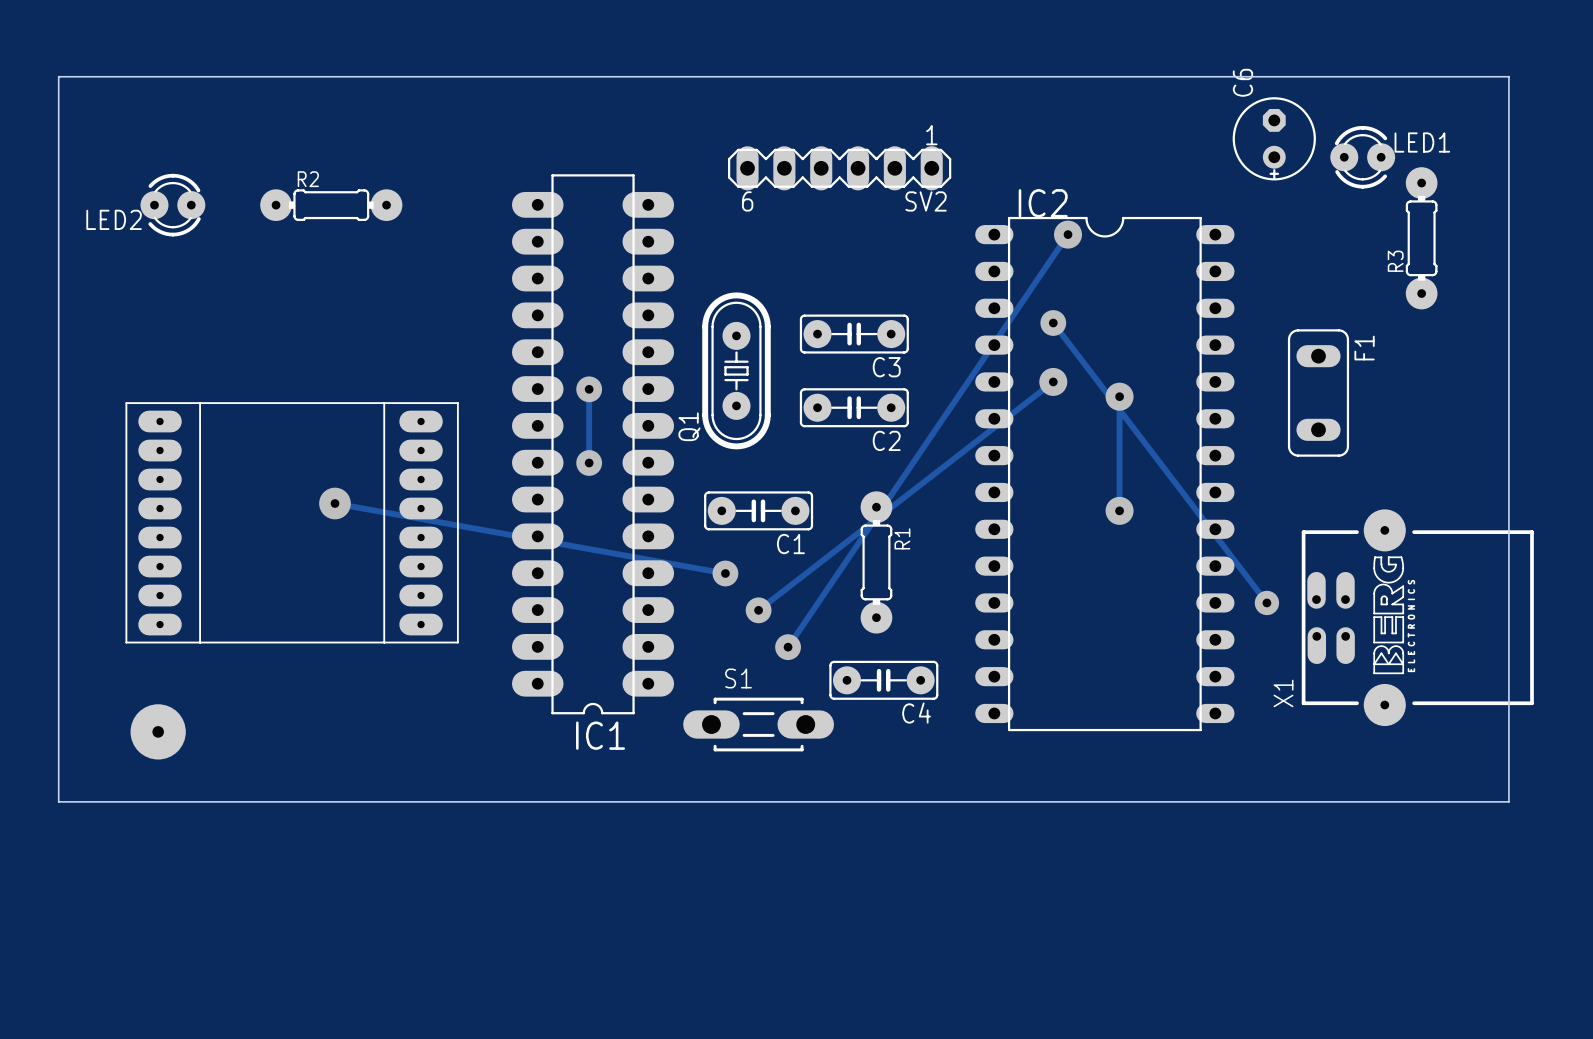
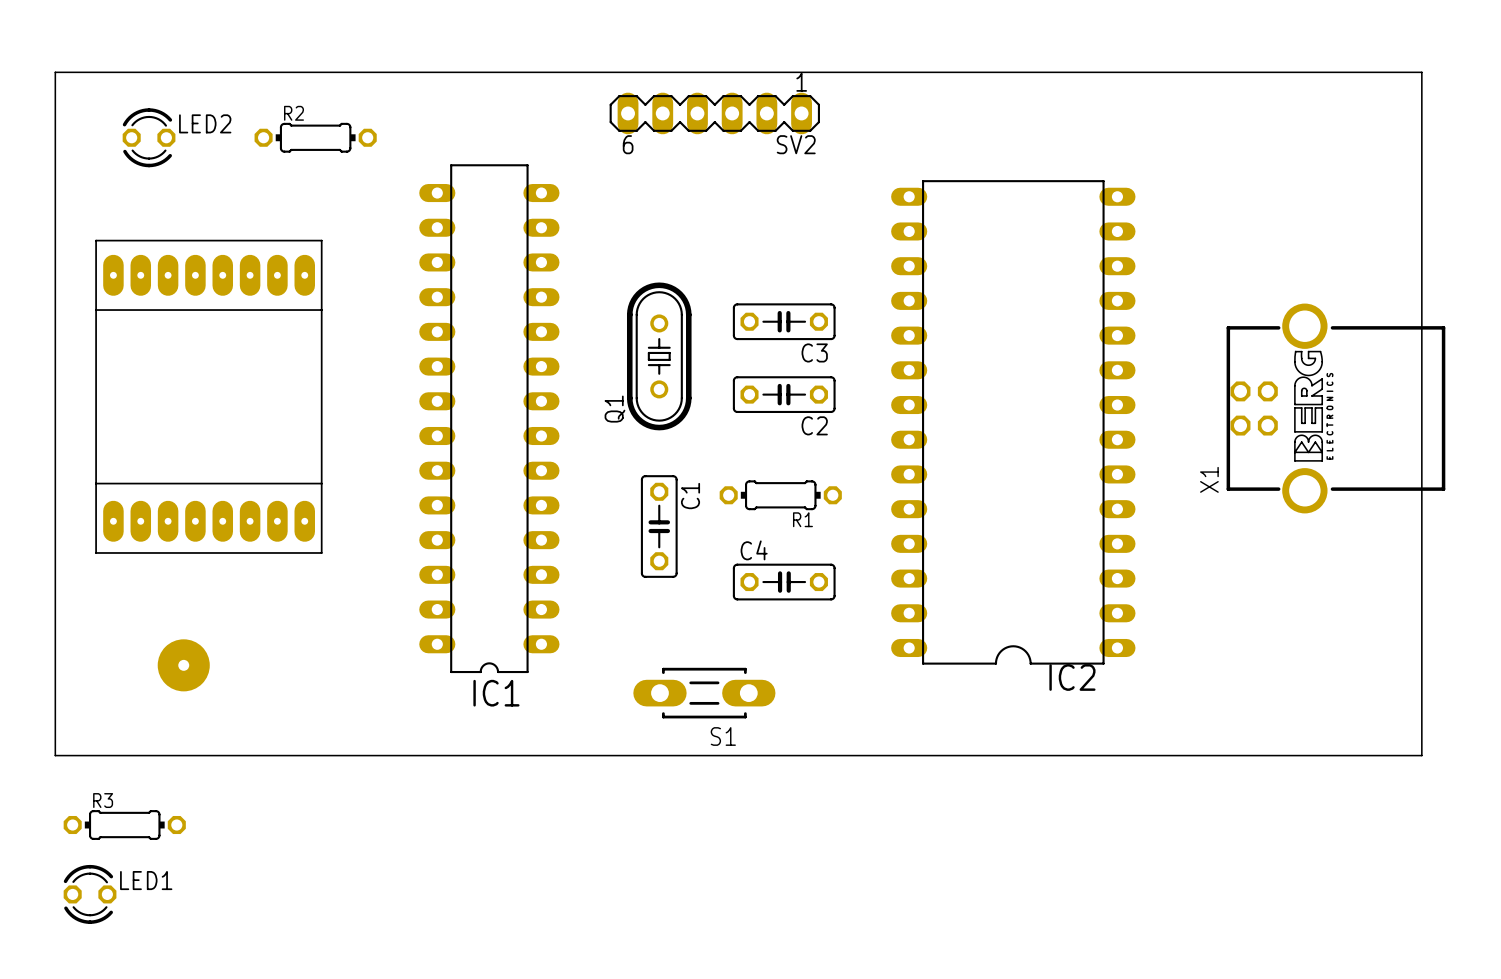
LED1 footprint: [1330, 125, 1396, 189] -> [63, 864, 117, 924]
C6: (1274, 138) -> none
R3 footprint: [1405, 167, 1438, 310] -> [63, 810, 186, 840]
SV2 position: (839, 168) -> (714, 113)
LED2 footprint: [140, 173, 206, 237] -> [122, 108, 176, 168]
IC1 footprint: [511, 174, 675, 715] -> [419, 164, 560, 674]
R2 footprint: [260, 189, 403, 221] -> [254, 122, 377, 153]
LED2 name position: LED2 (114, 219) -> LED2 (205, 123)
track: (1068, 234) (788, 647) -> none
via: (1068, 234) -> none
R3 name position: R3 (1395, 261) -> R3 (103, 800)
Q1 footprint: [702, 292, 771, 450] -> [626, 282, 692, 431]
C3 footprint: [799, 314, 909, 354] -> [732, 303, 836, 341]
track: (1053, 323) (1266, 602) -> none
via: (1053, 323) -> none
track: (1053, 381) (758, 610) -> none
via: (1053, 381) -> none
C2 footprint: [799, 388, 909, 428] -> [732, 376, 836, 414]
track: (589, 389) (589, 462) -> none
via: (589, 389) -> none
F1: (1318, 393) -> none
track: (1119, 396) (1119, 510) -> none
via: (1119, 396) -> none
via: (589, 462) -> none
IC2 rotation: 0° (1104, 474) -> 180° (1013, 422)
C1 footprint: [704, 491, 814, 531] -> [640, 475, 678, 578]
R1 footprint: [860, 491, 893, 634] -> [719, 480, 842, 511]
track: (334, 503) (725, 573) -> none
via: (334, 503) -> none
X1 footprint: [1301, 509, 1534, 727] -> [1226, 303, 1446, 514]
via: (1119, 510) -> none
part rotation: 0° (292, 522) -> 90° counterclockwise (208, 396)
R1 name position: R1 (902, 538) -> R1 (802, 519)
C1 name position: C1 (790, 544) -> C1 (690, 496)
via: (725, 573) -> none
via: (1266, 602) -> none
via: (758, 610) -> none
via: (788, 647) -> none
C4 footprint: [829, 660, 939, 700] -> [732, 563, 836, 601]
S1 name position: S1 (738, 678) -> S1 (723, 736)
C4 name position: C4 (916, 713) -> C4 (754, 550)
S1 position: (758, 724) -> (704, 693)
part position: (158, 731) -> (183, 665)

